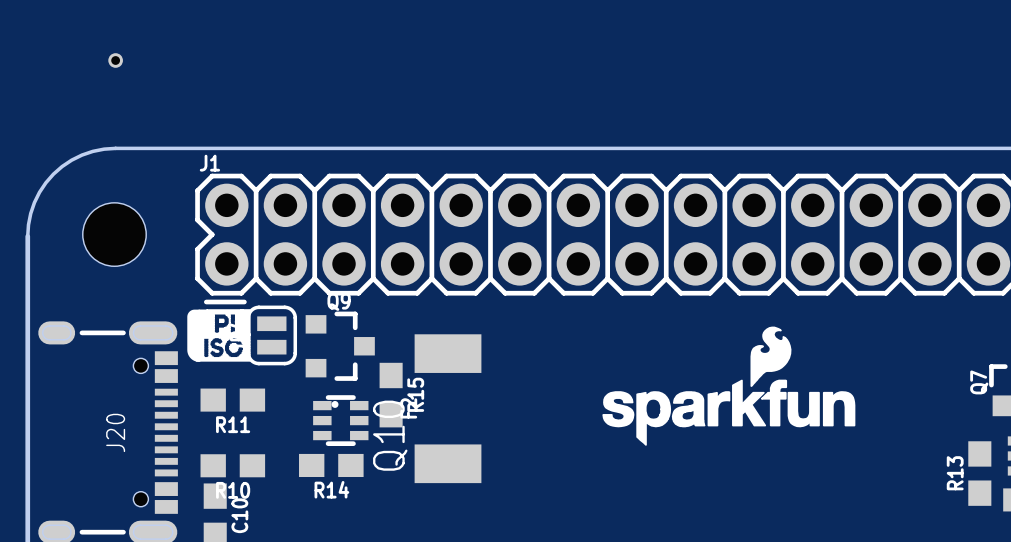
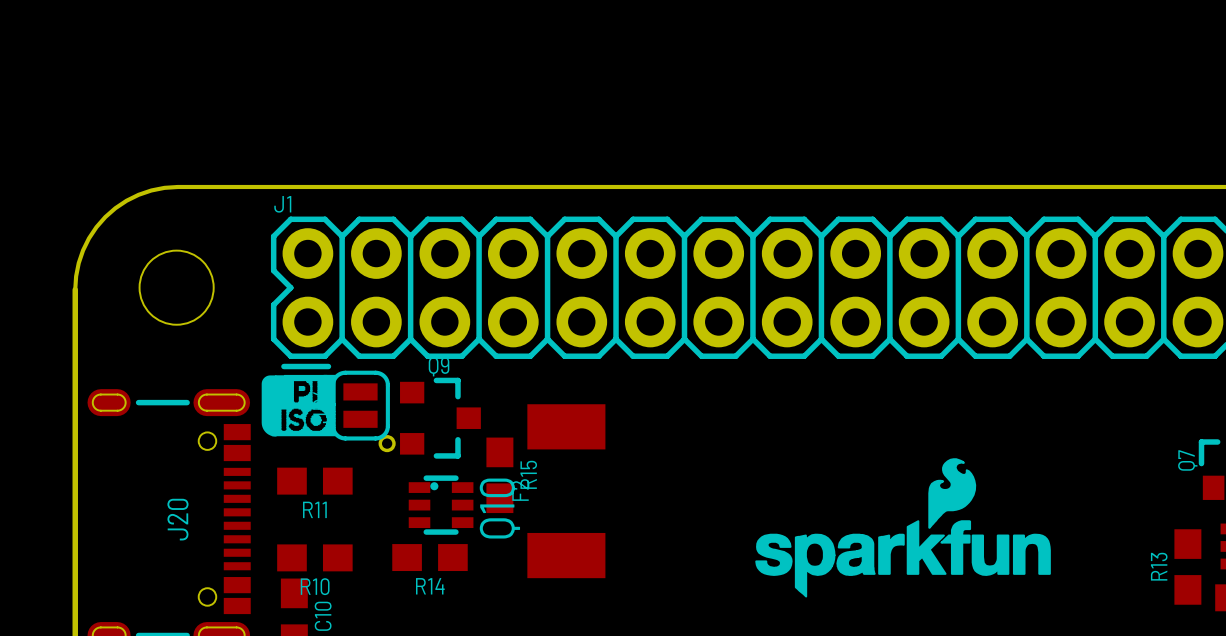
part position: (115, 60) -> (387, 443)
drawing position: (728, 386) -> (903, 527)

